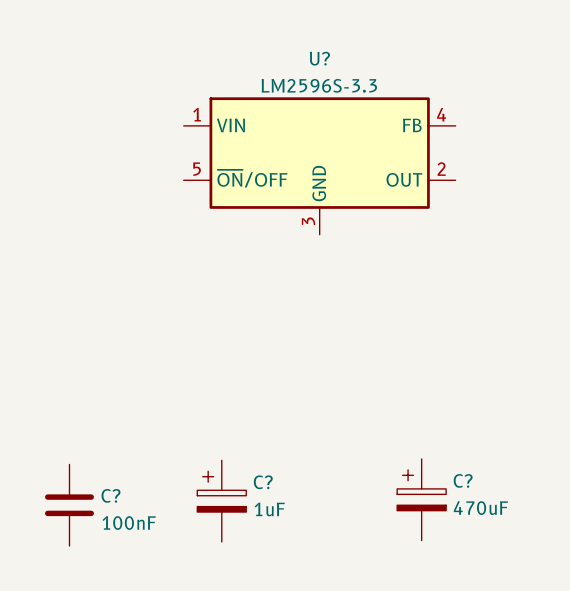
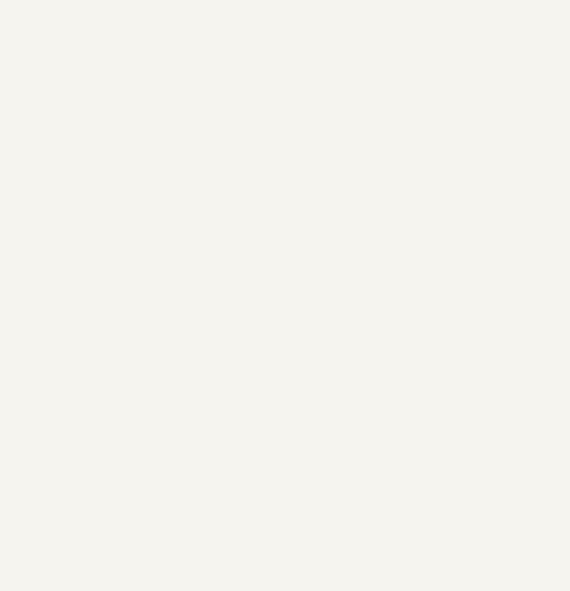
U?: LM2596S-3.3 (319, 166) -> none
C?: 470uF (421, 499) -> none
C?: 1uF (221, 501) -> none
C?: 100nF (69, 505) -> none

